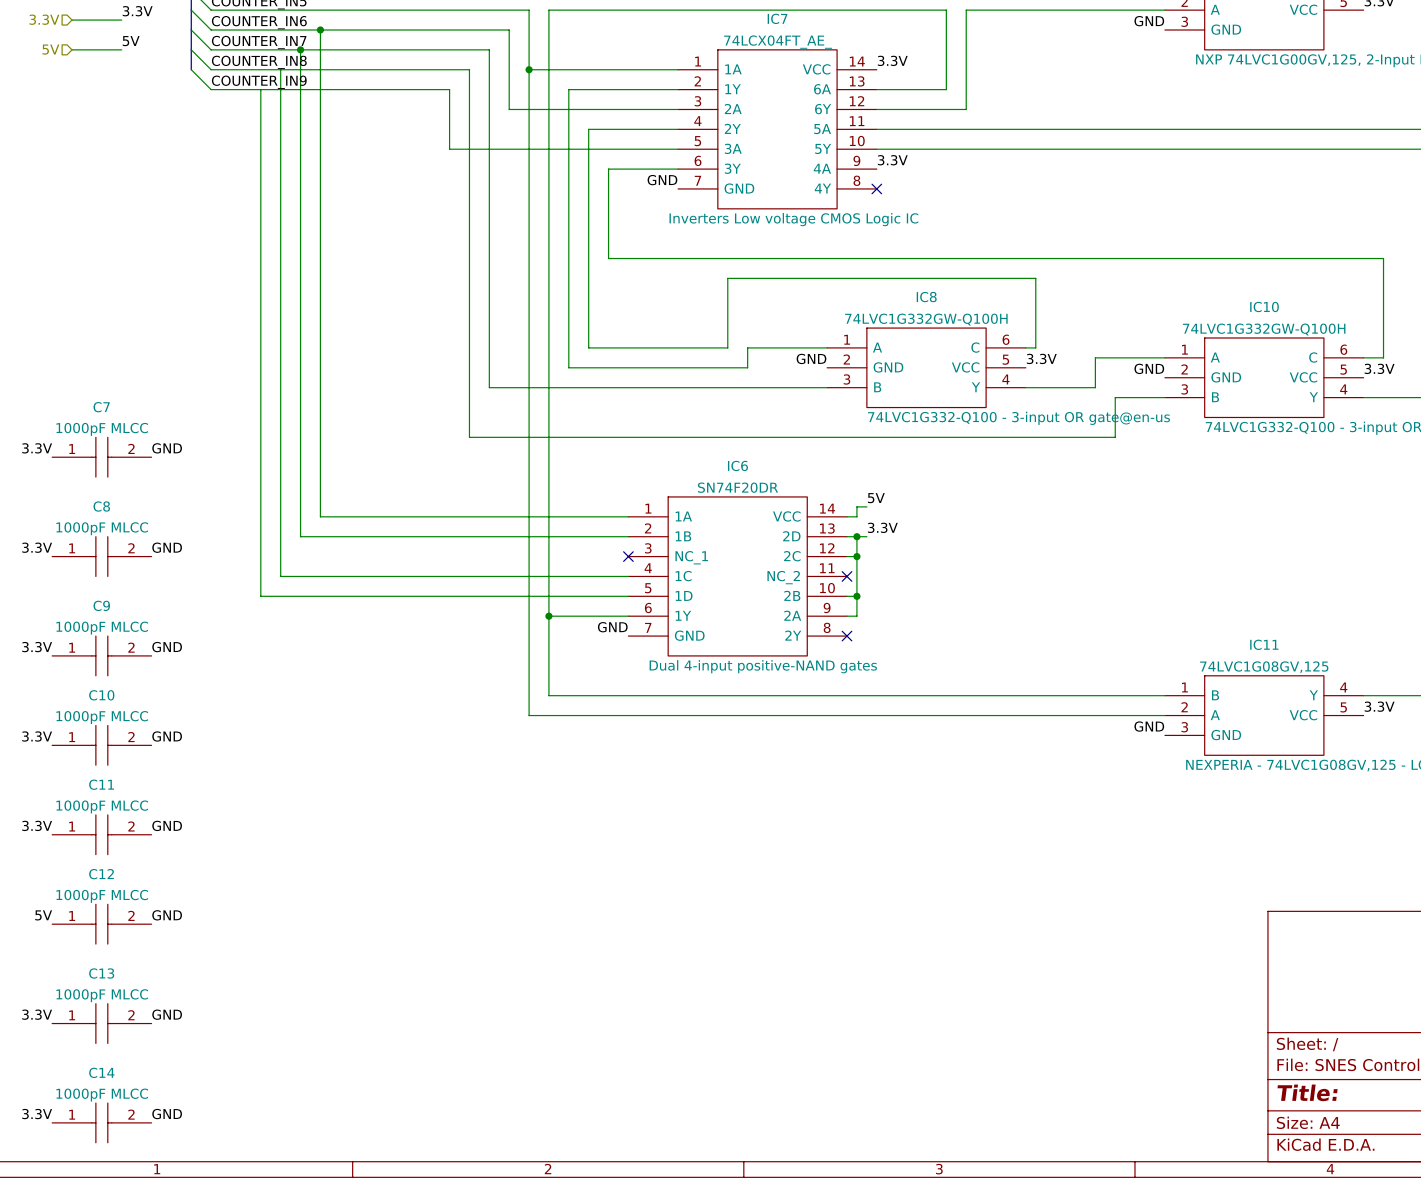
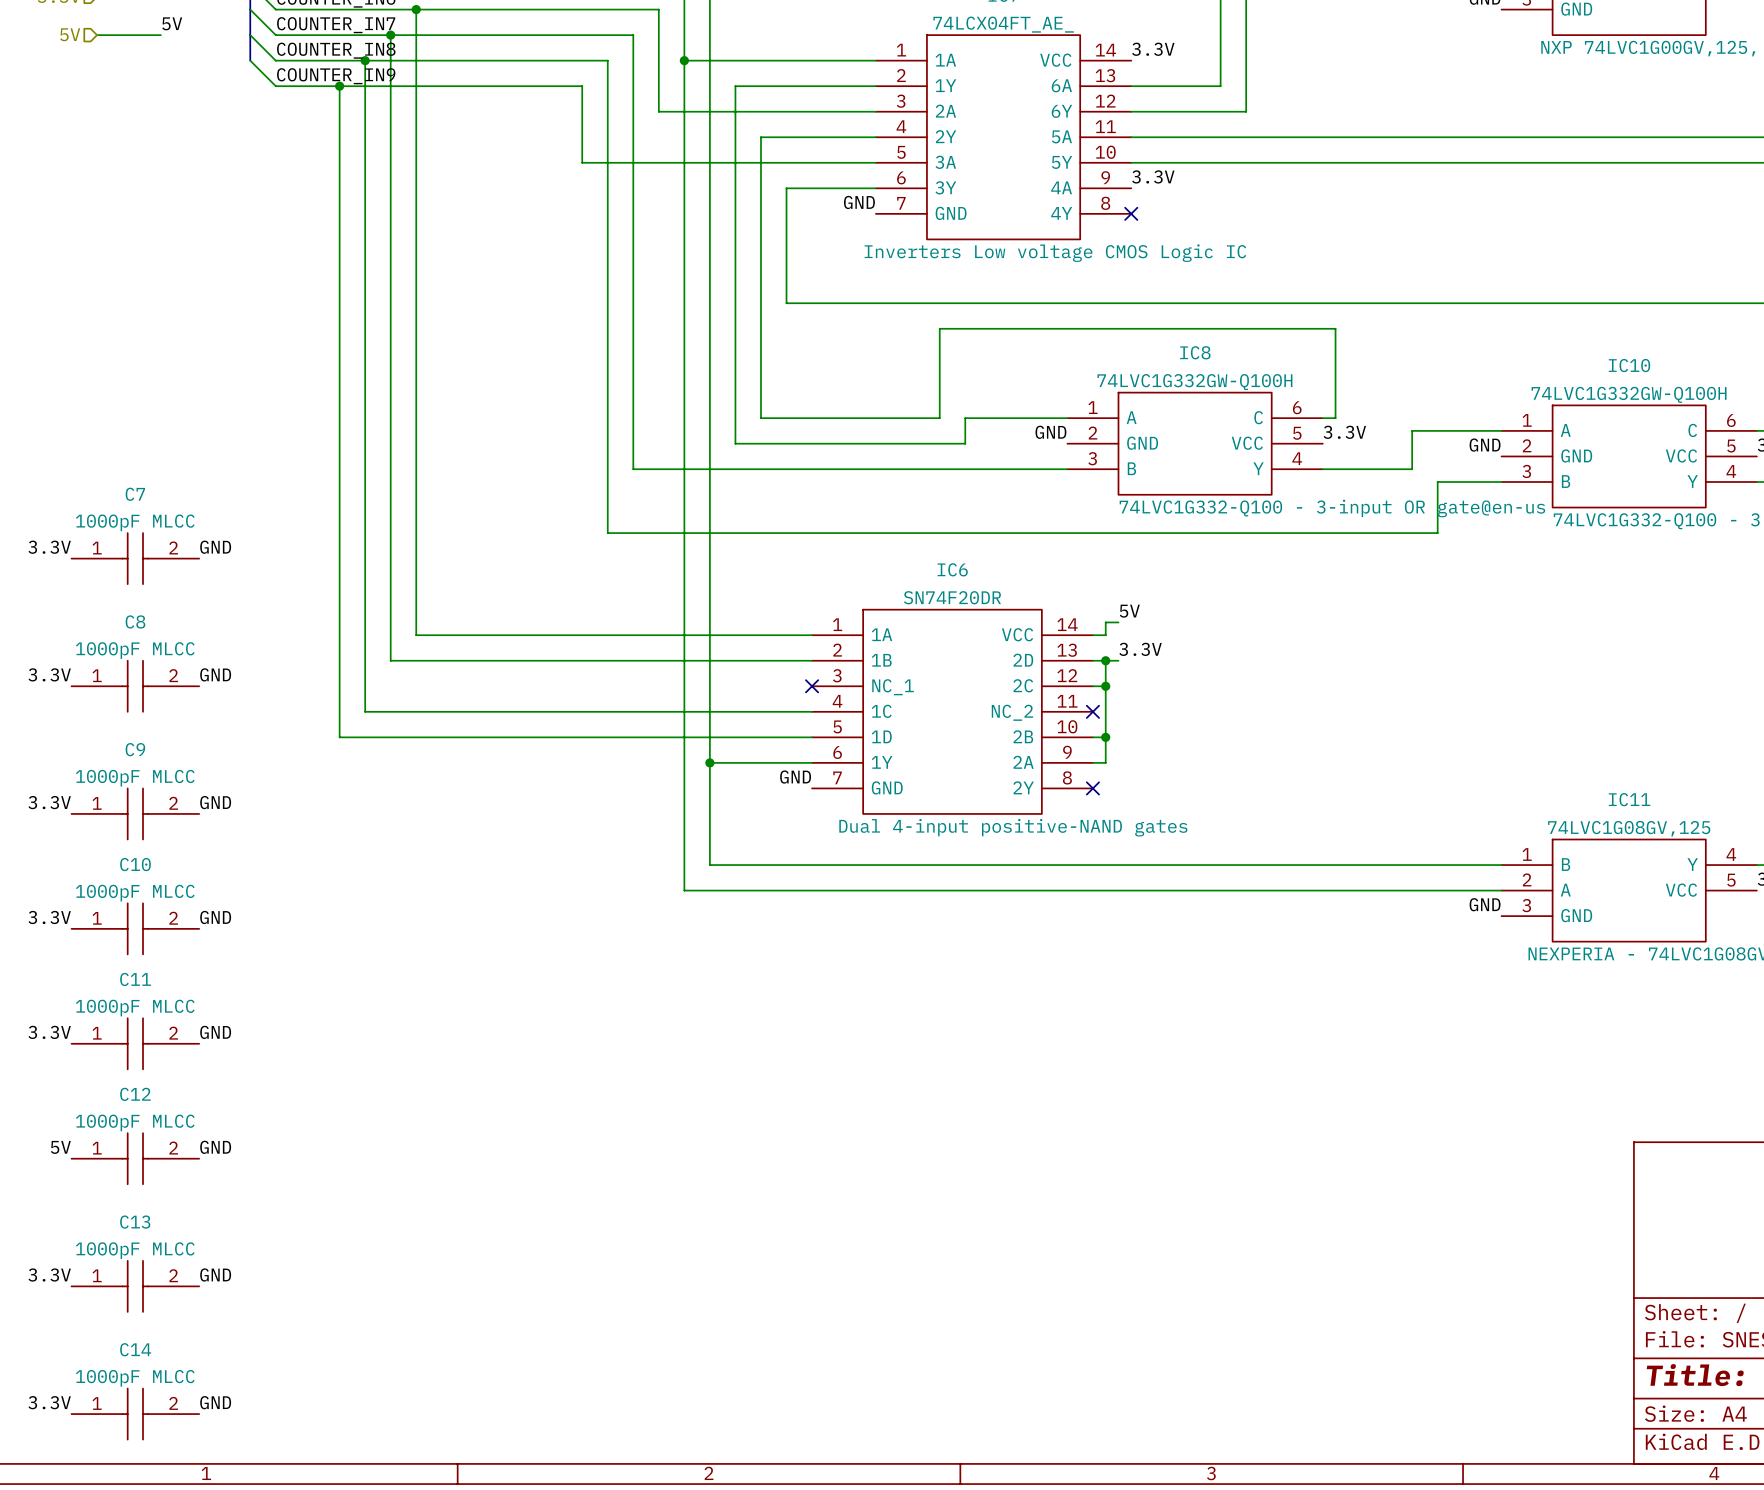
junction: none -> (365, 60)
junction: none -> (339, 86)

